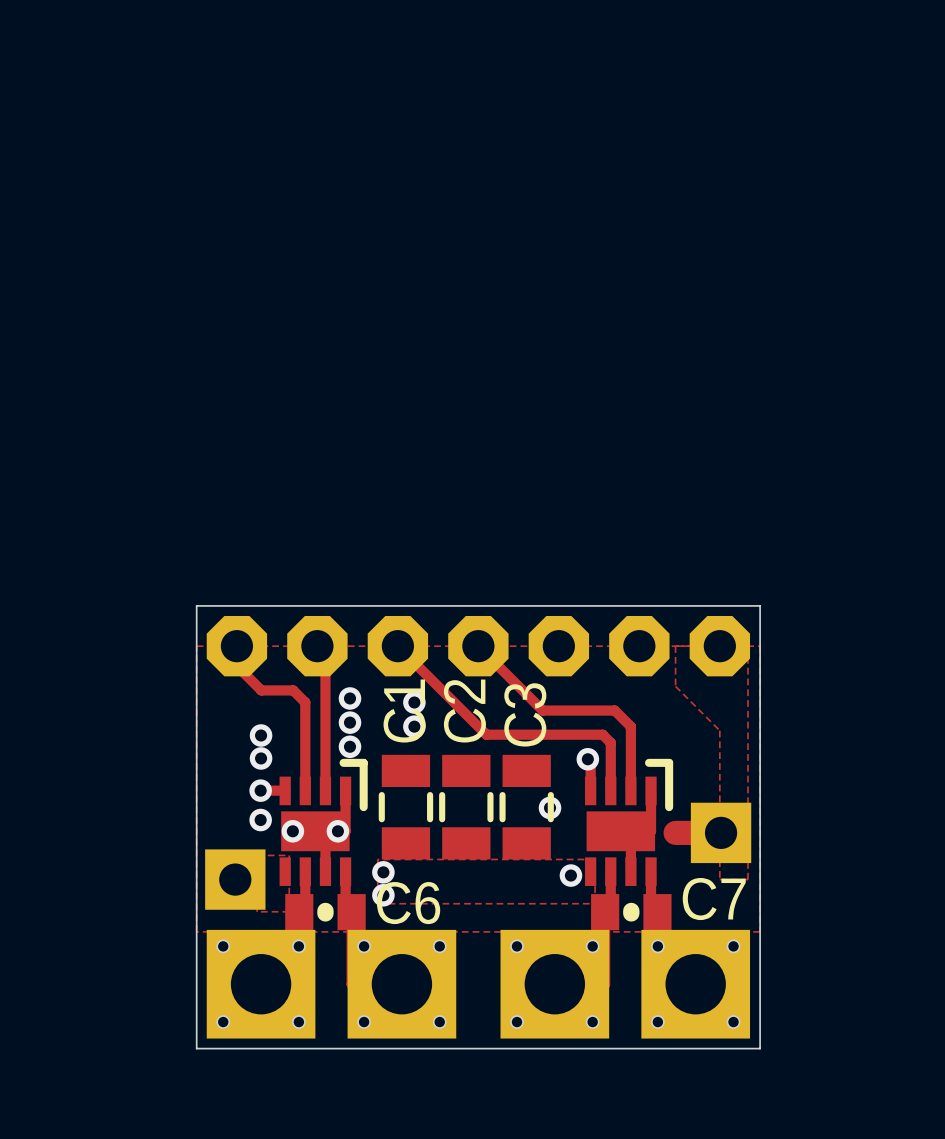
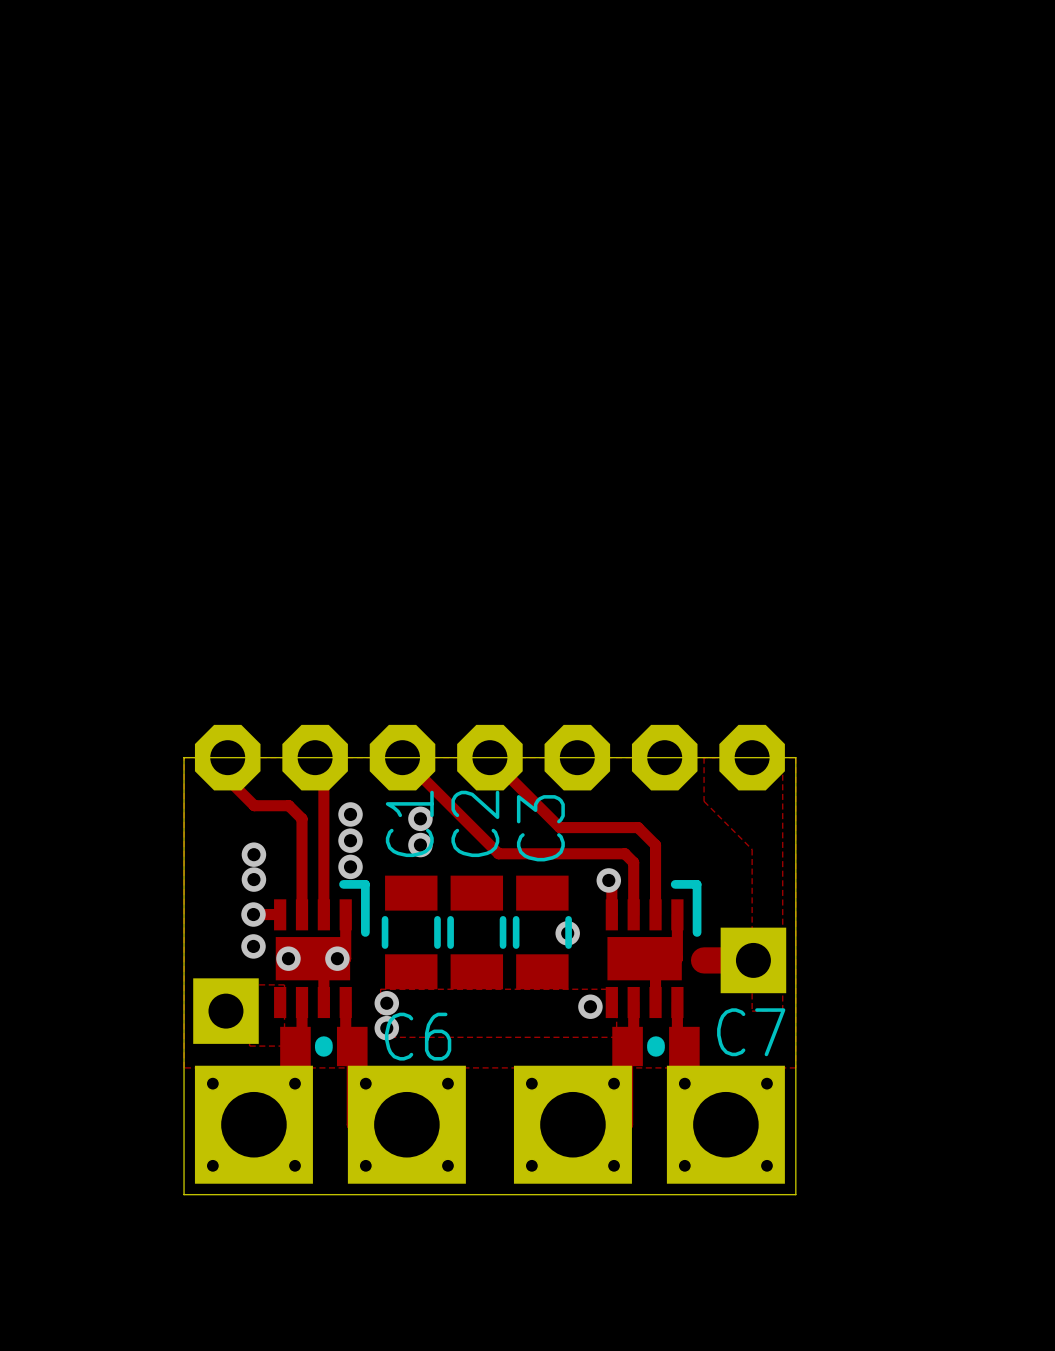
board edge: (196, 646) (196, 605) (760, 605) (760, 646) -> (184, 757) (795, 757)

